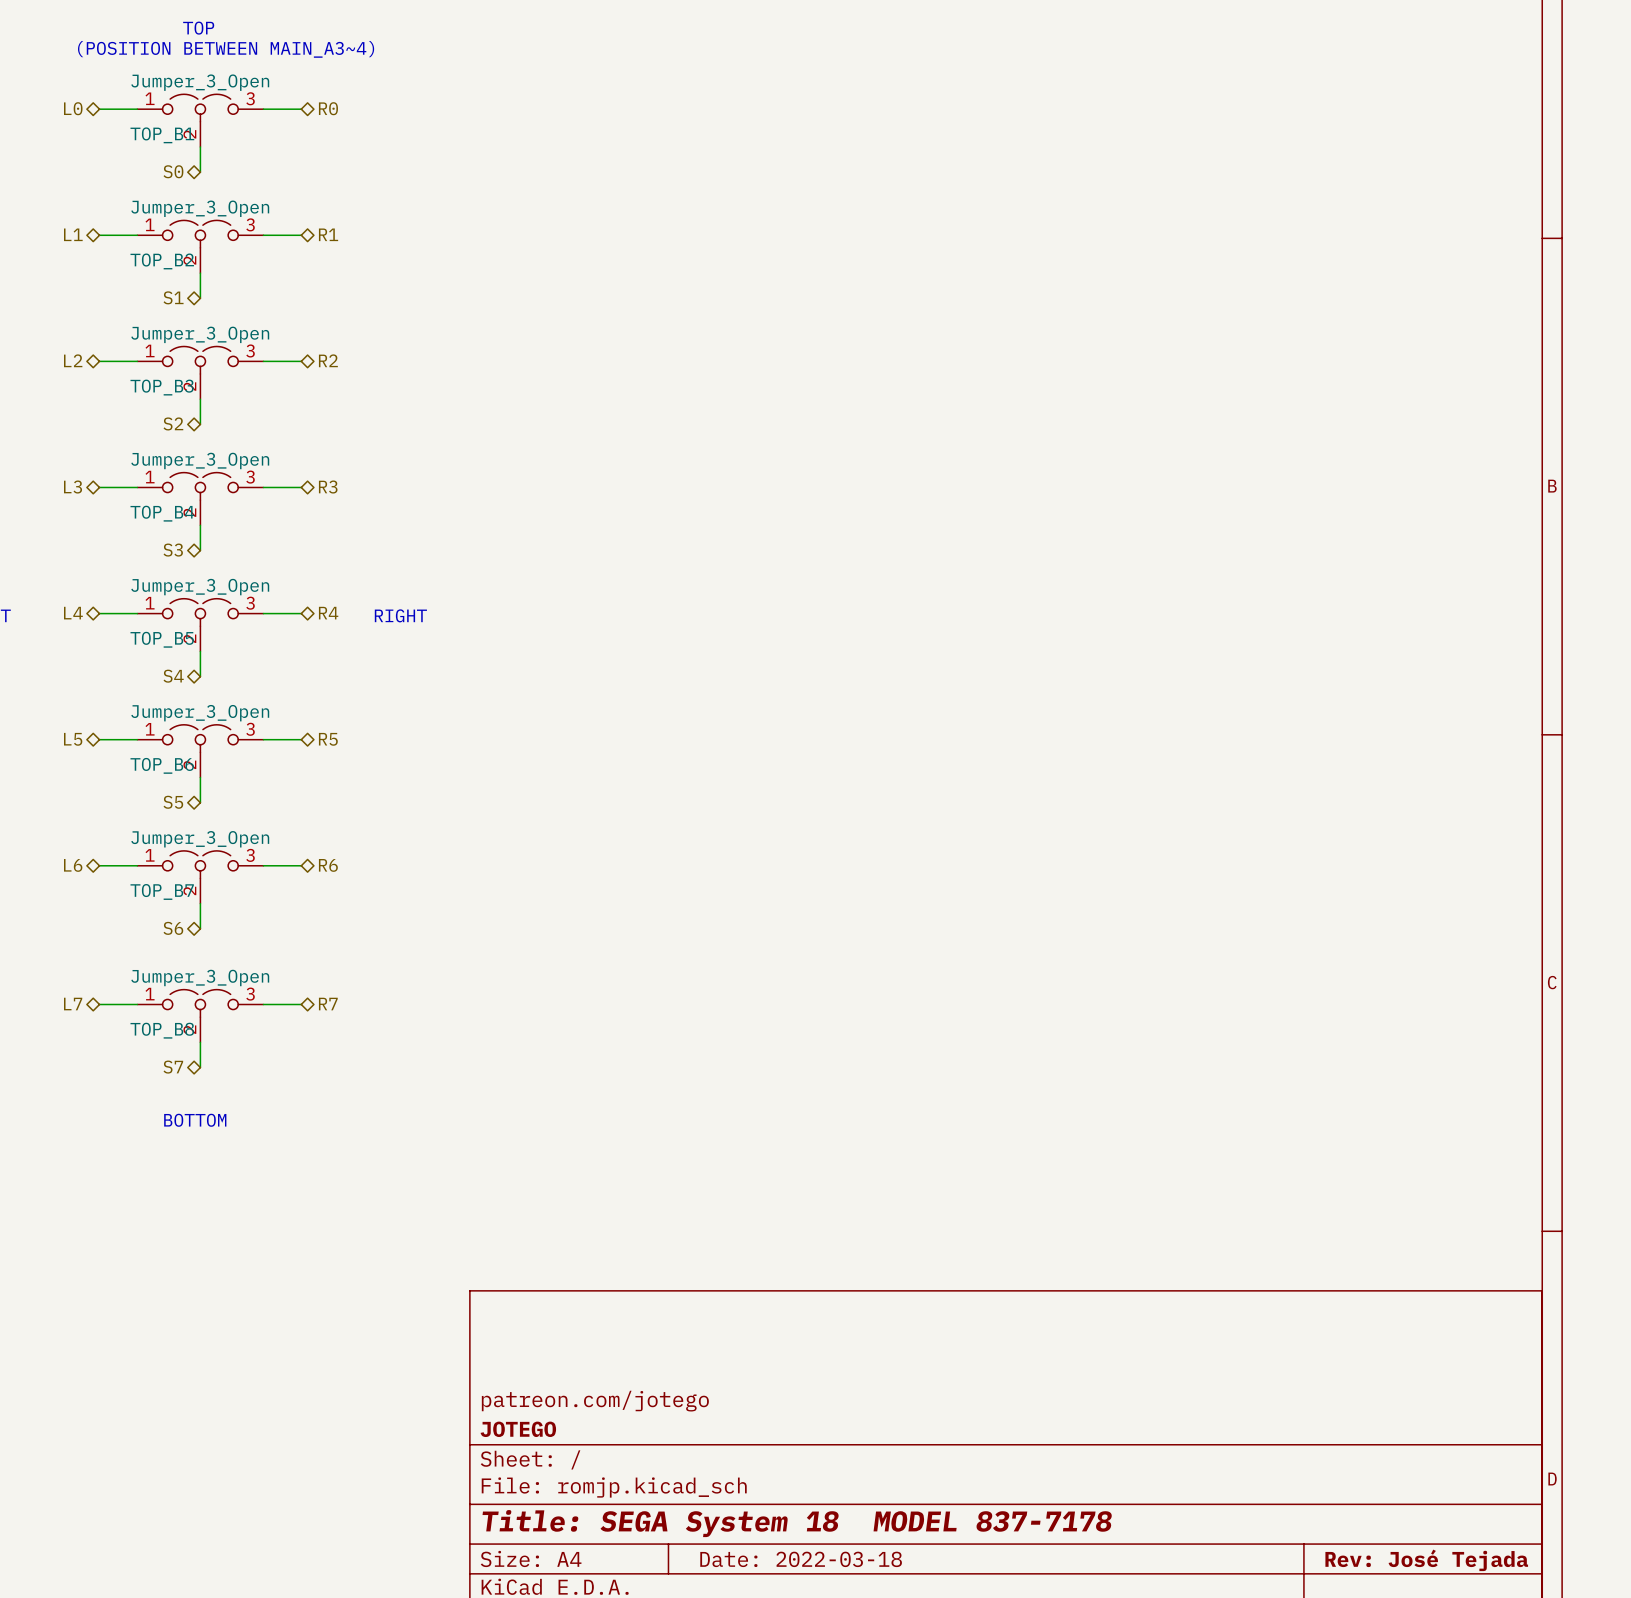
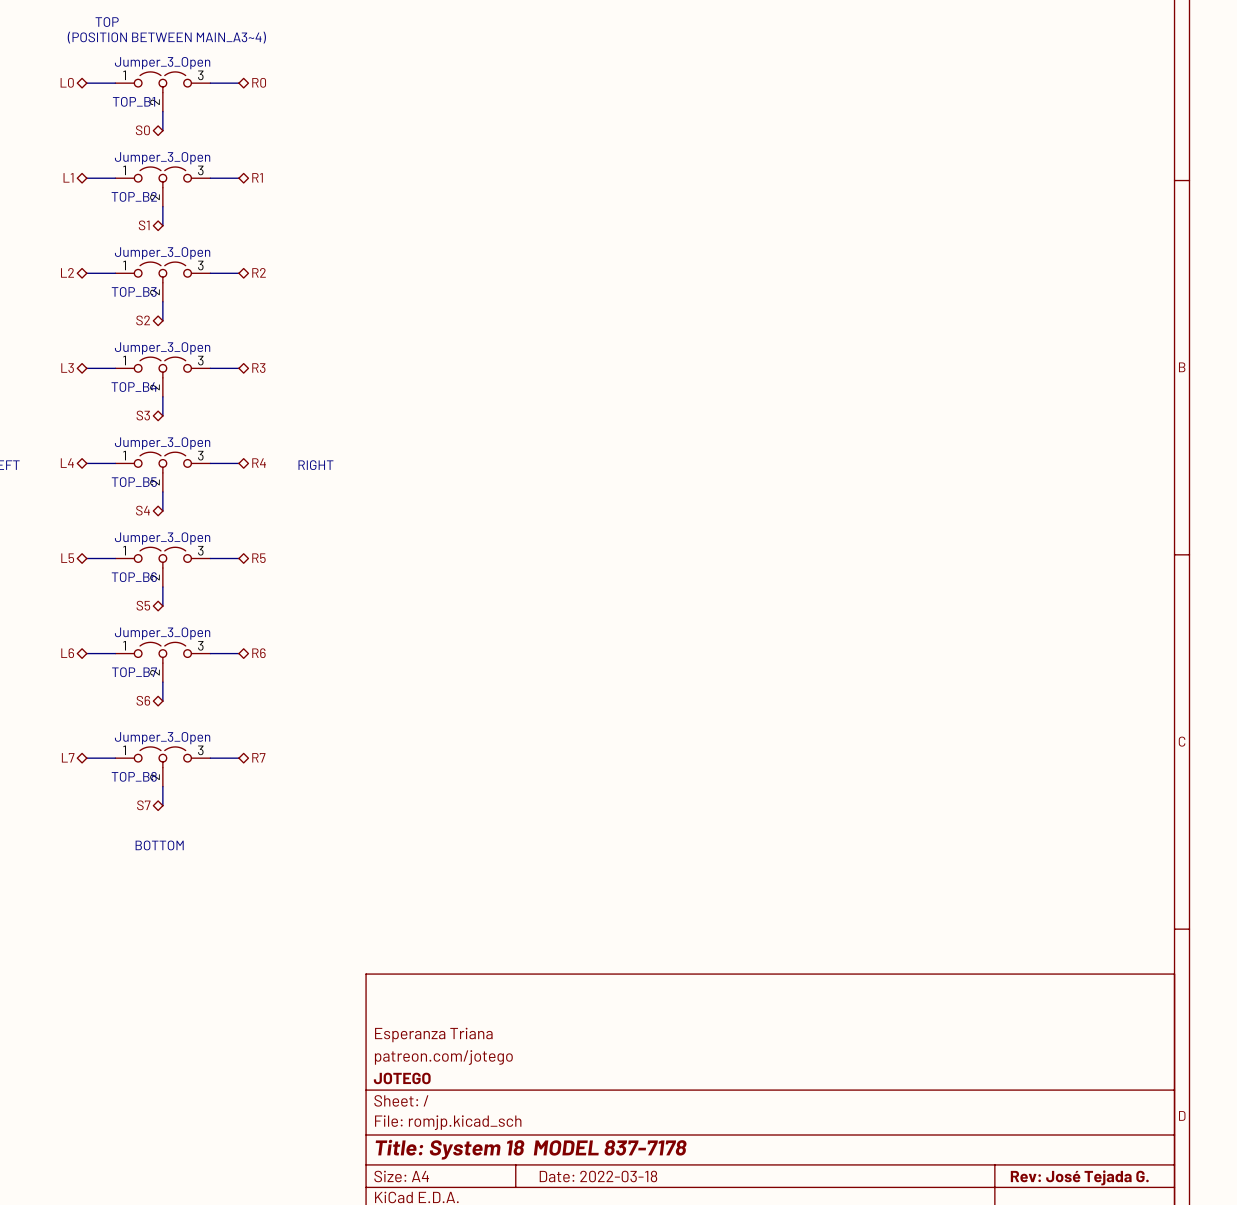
title block: none -> Esperanza Triana (433, 1034)
title block: Title: SEGA System 18 MODEL 837-7178 (797, 1523) -> Title: System 18 MODEL 837-7178 (531, 1149)
title block: Rev: José Tejada (1426, 1560) -> Rev: José Tejada G. (1079, 1177)

